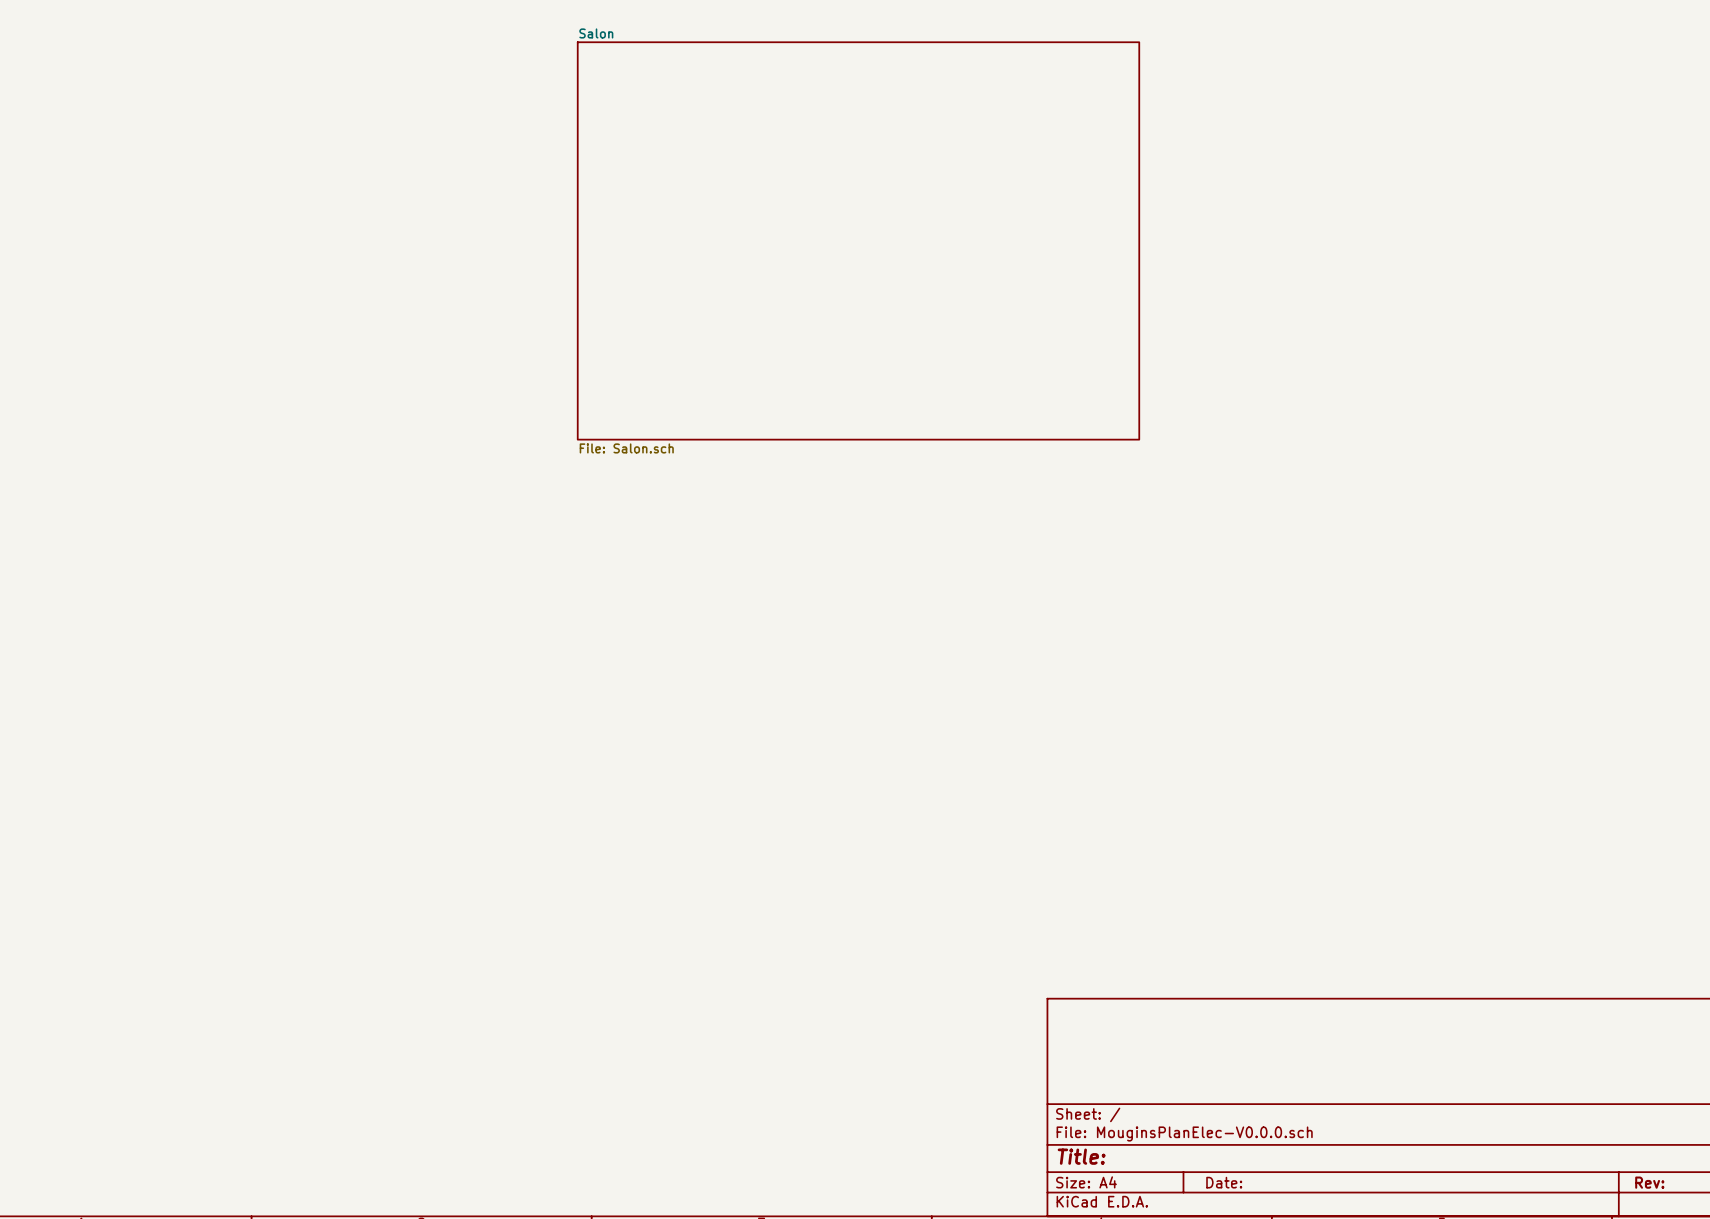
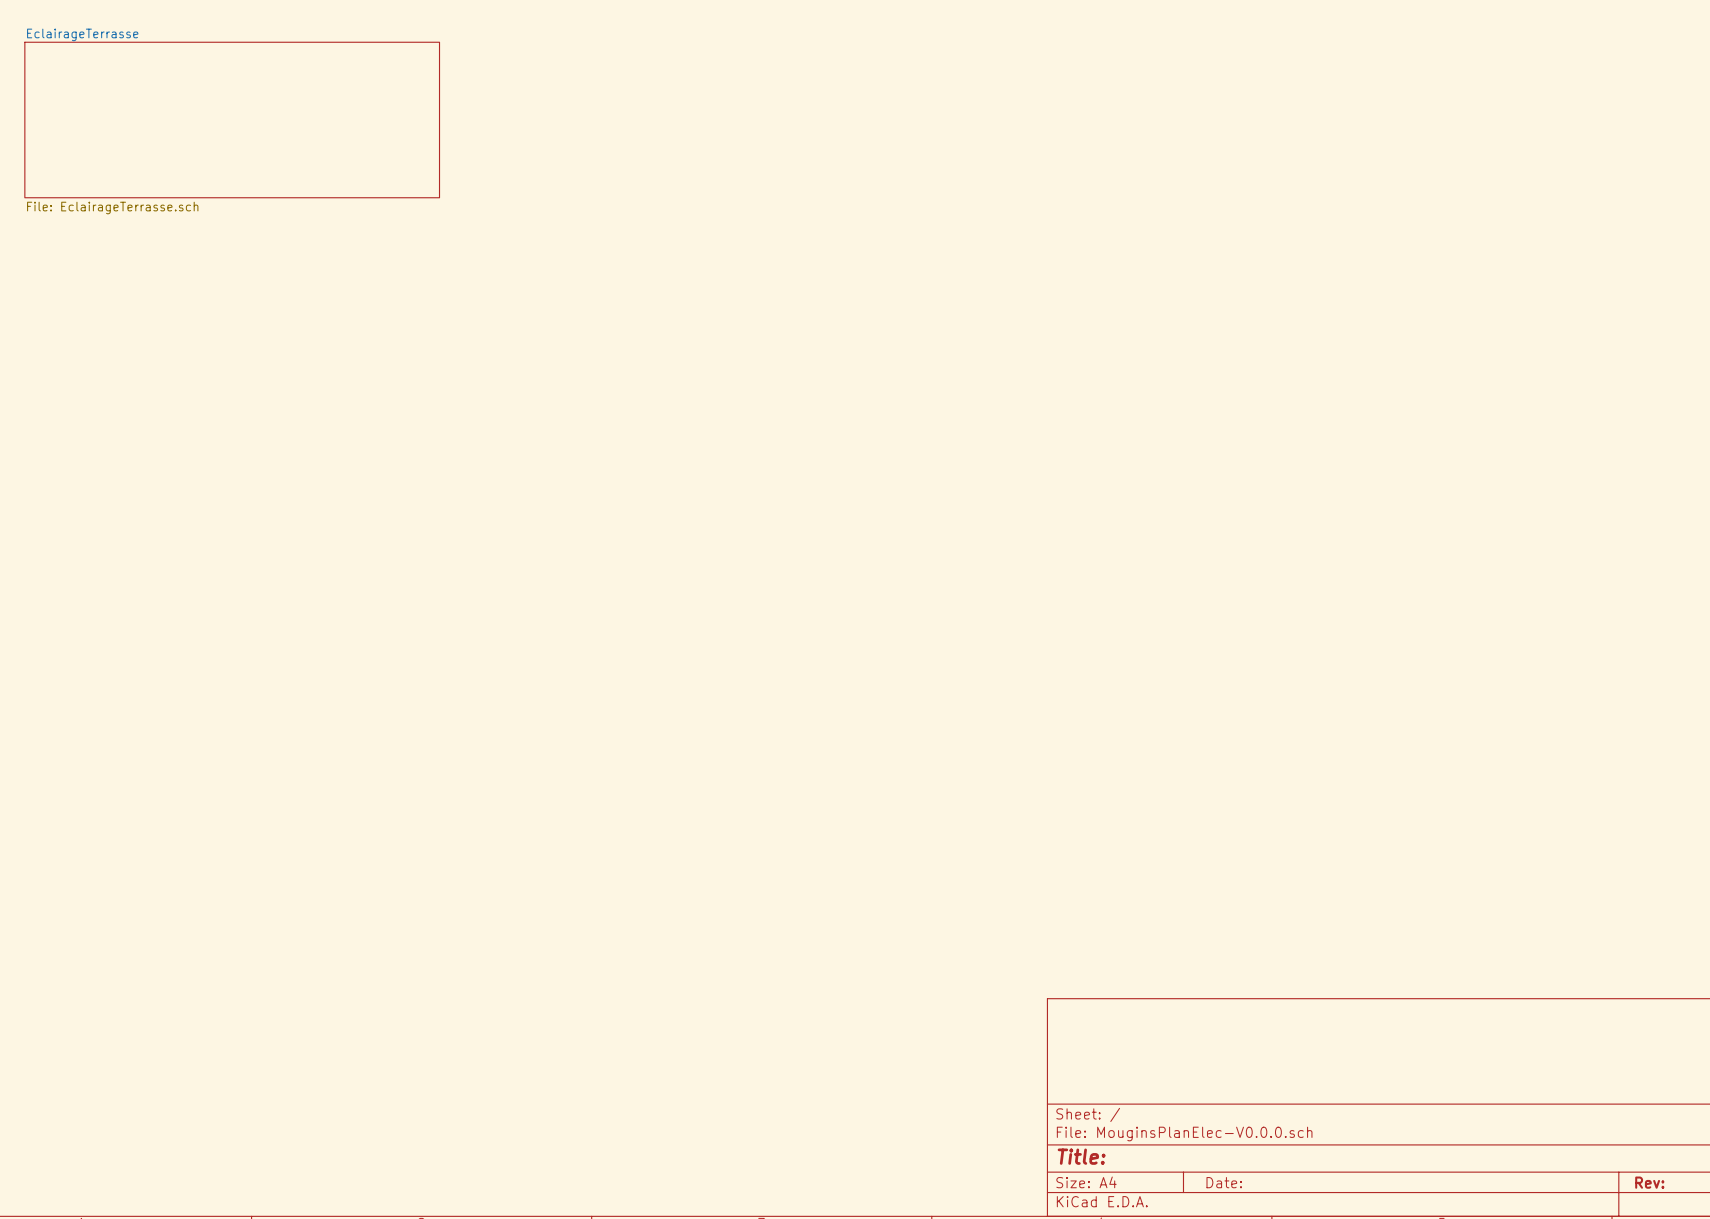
sheet EclairageTerrasse: none -> File: EclairageTerrasse.sch (232, 120)
sheet Salon: File: Salon.sch (858, 240) -> none

